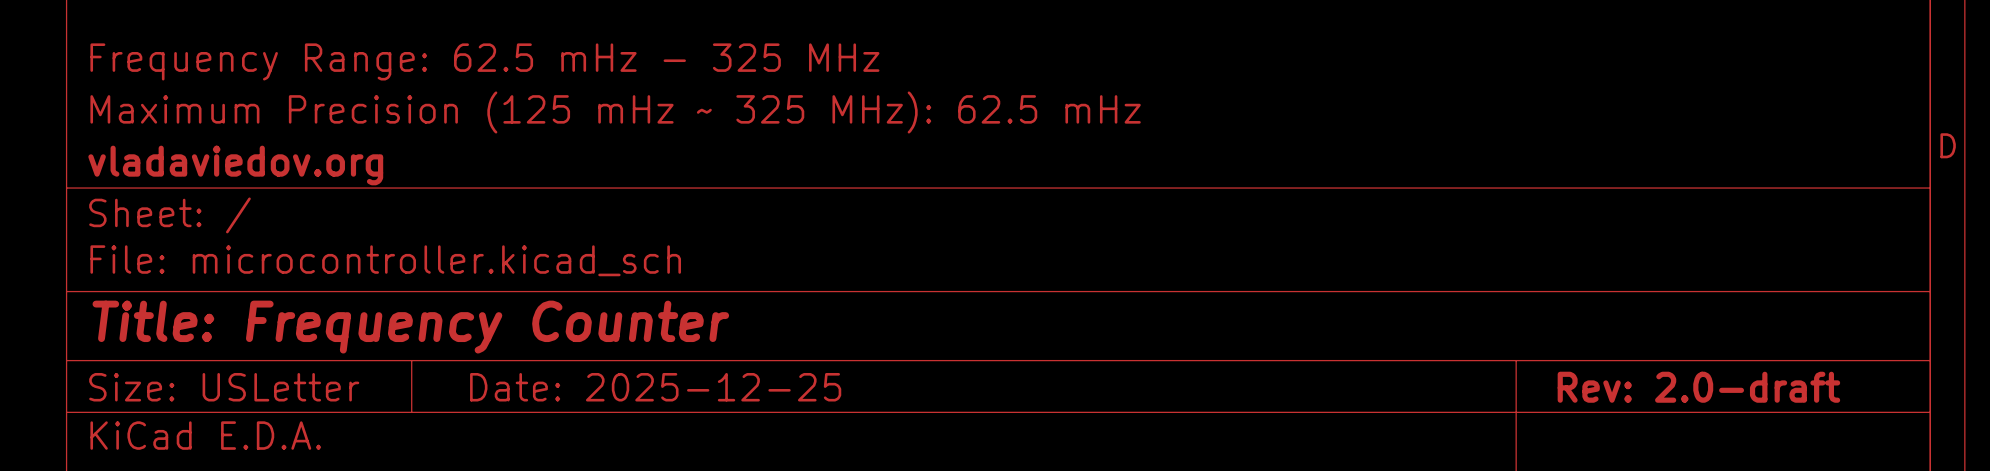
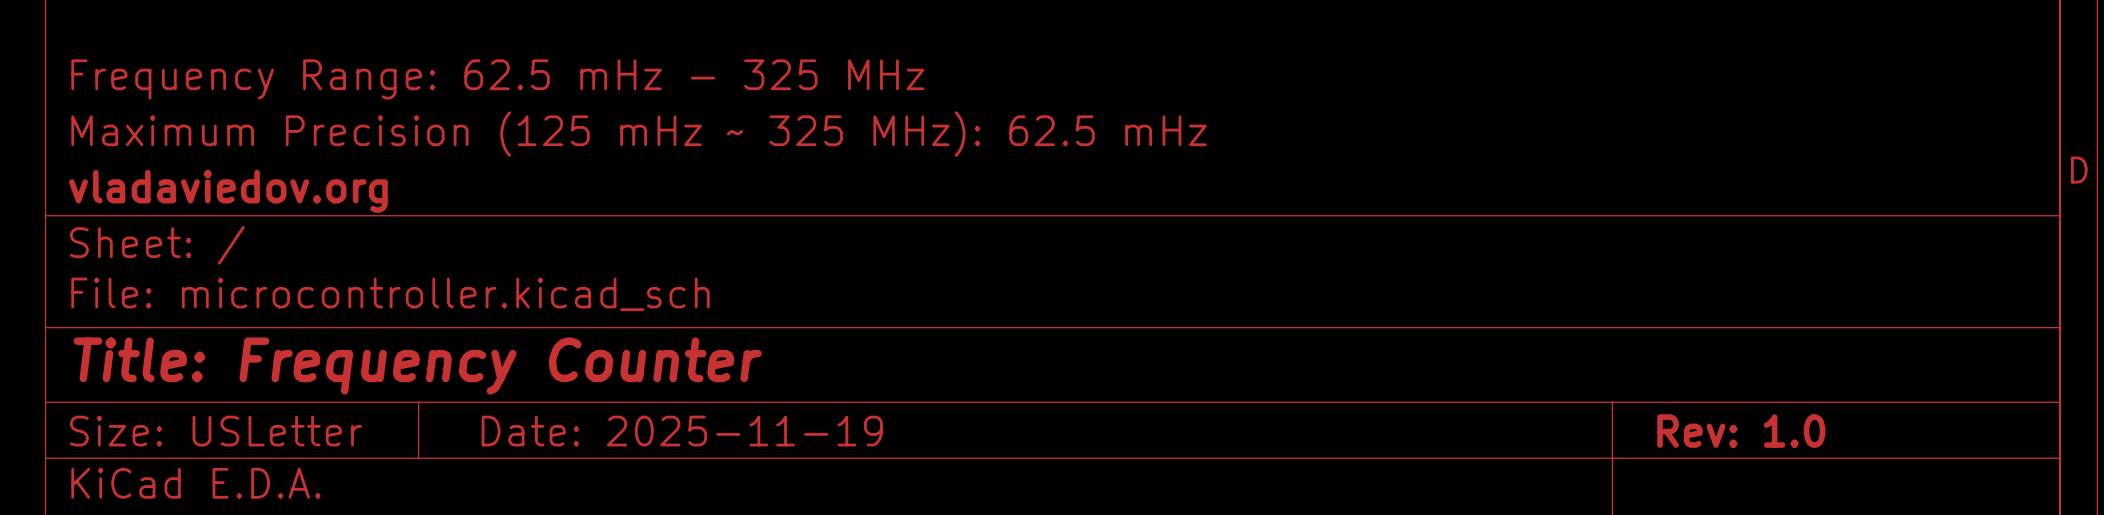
title block: Date: 2025-12-25 (655, 387) -> Date: 2025-11-19 (682, 431)
title block: Rev: 2.0-draft (1698, 387) -> Rev: 1.0 (1741, 431)

